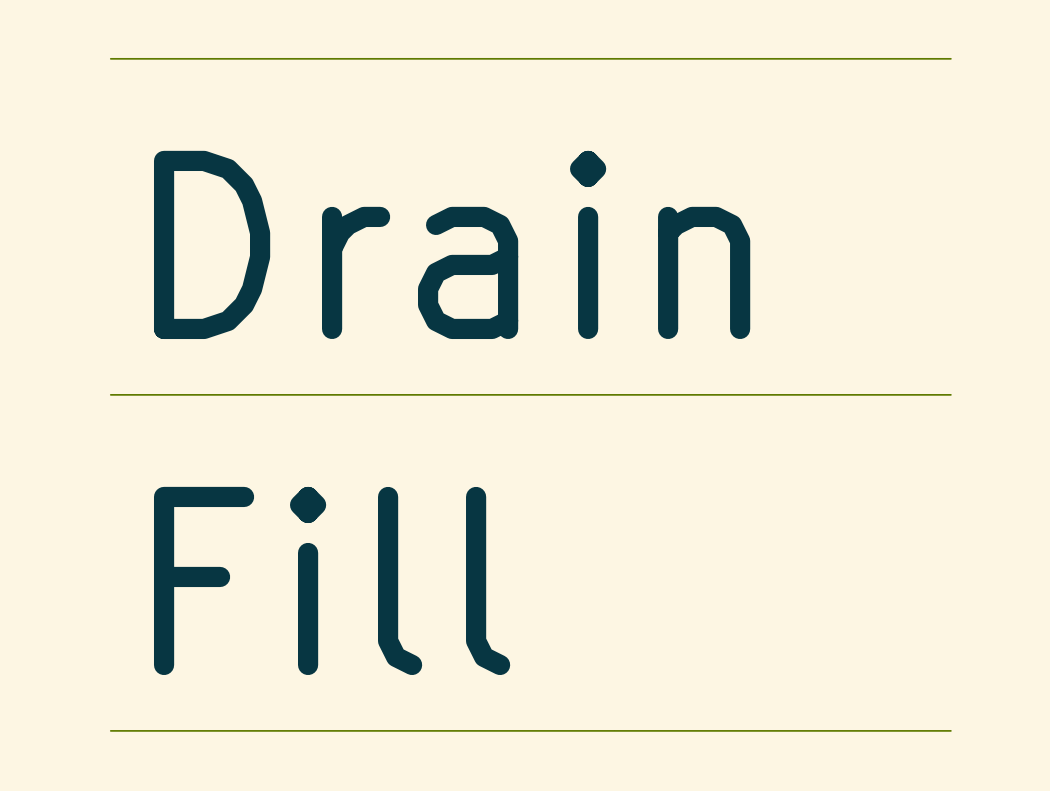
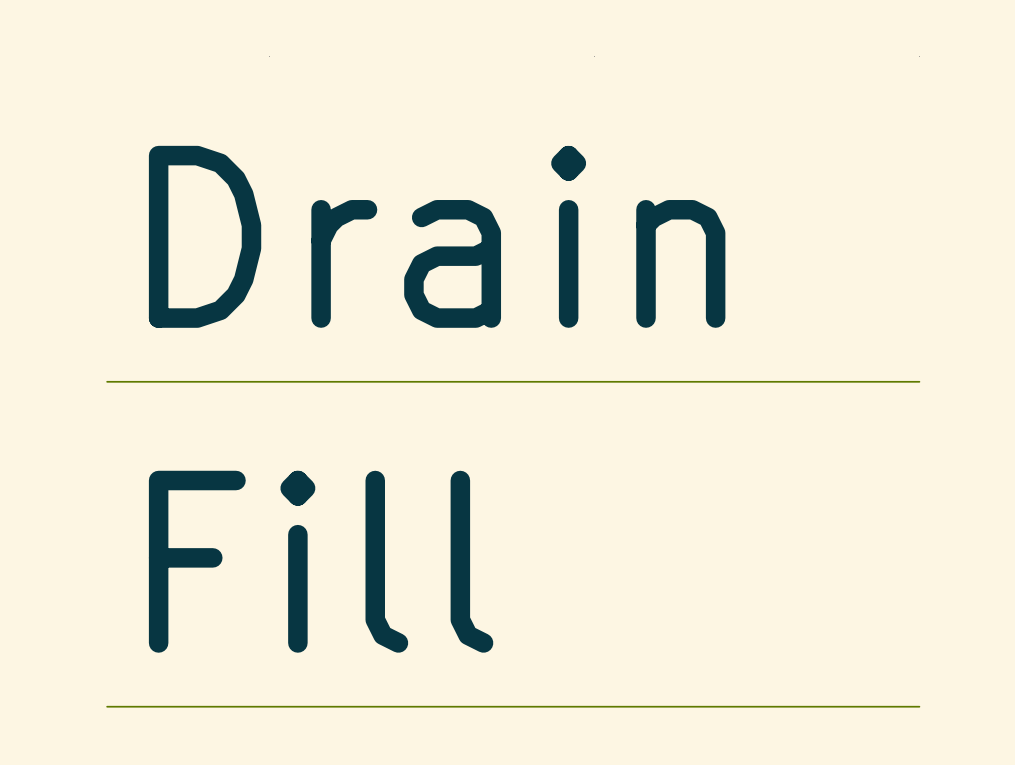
wire: (110, 58) (950, 58) -> none

